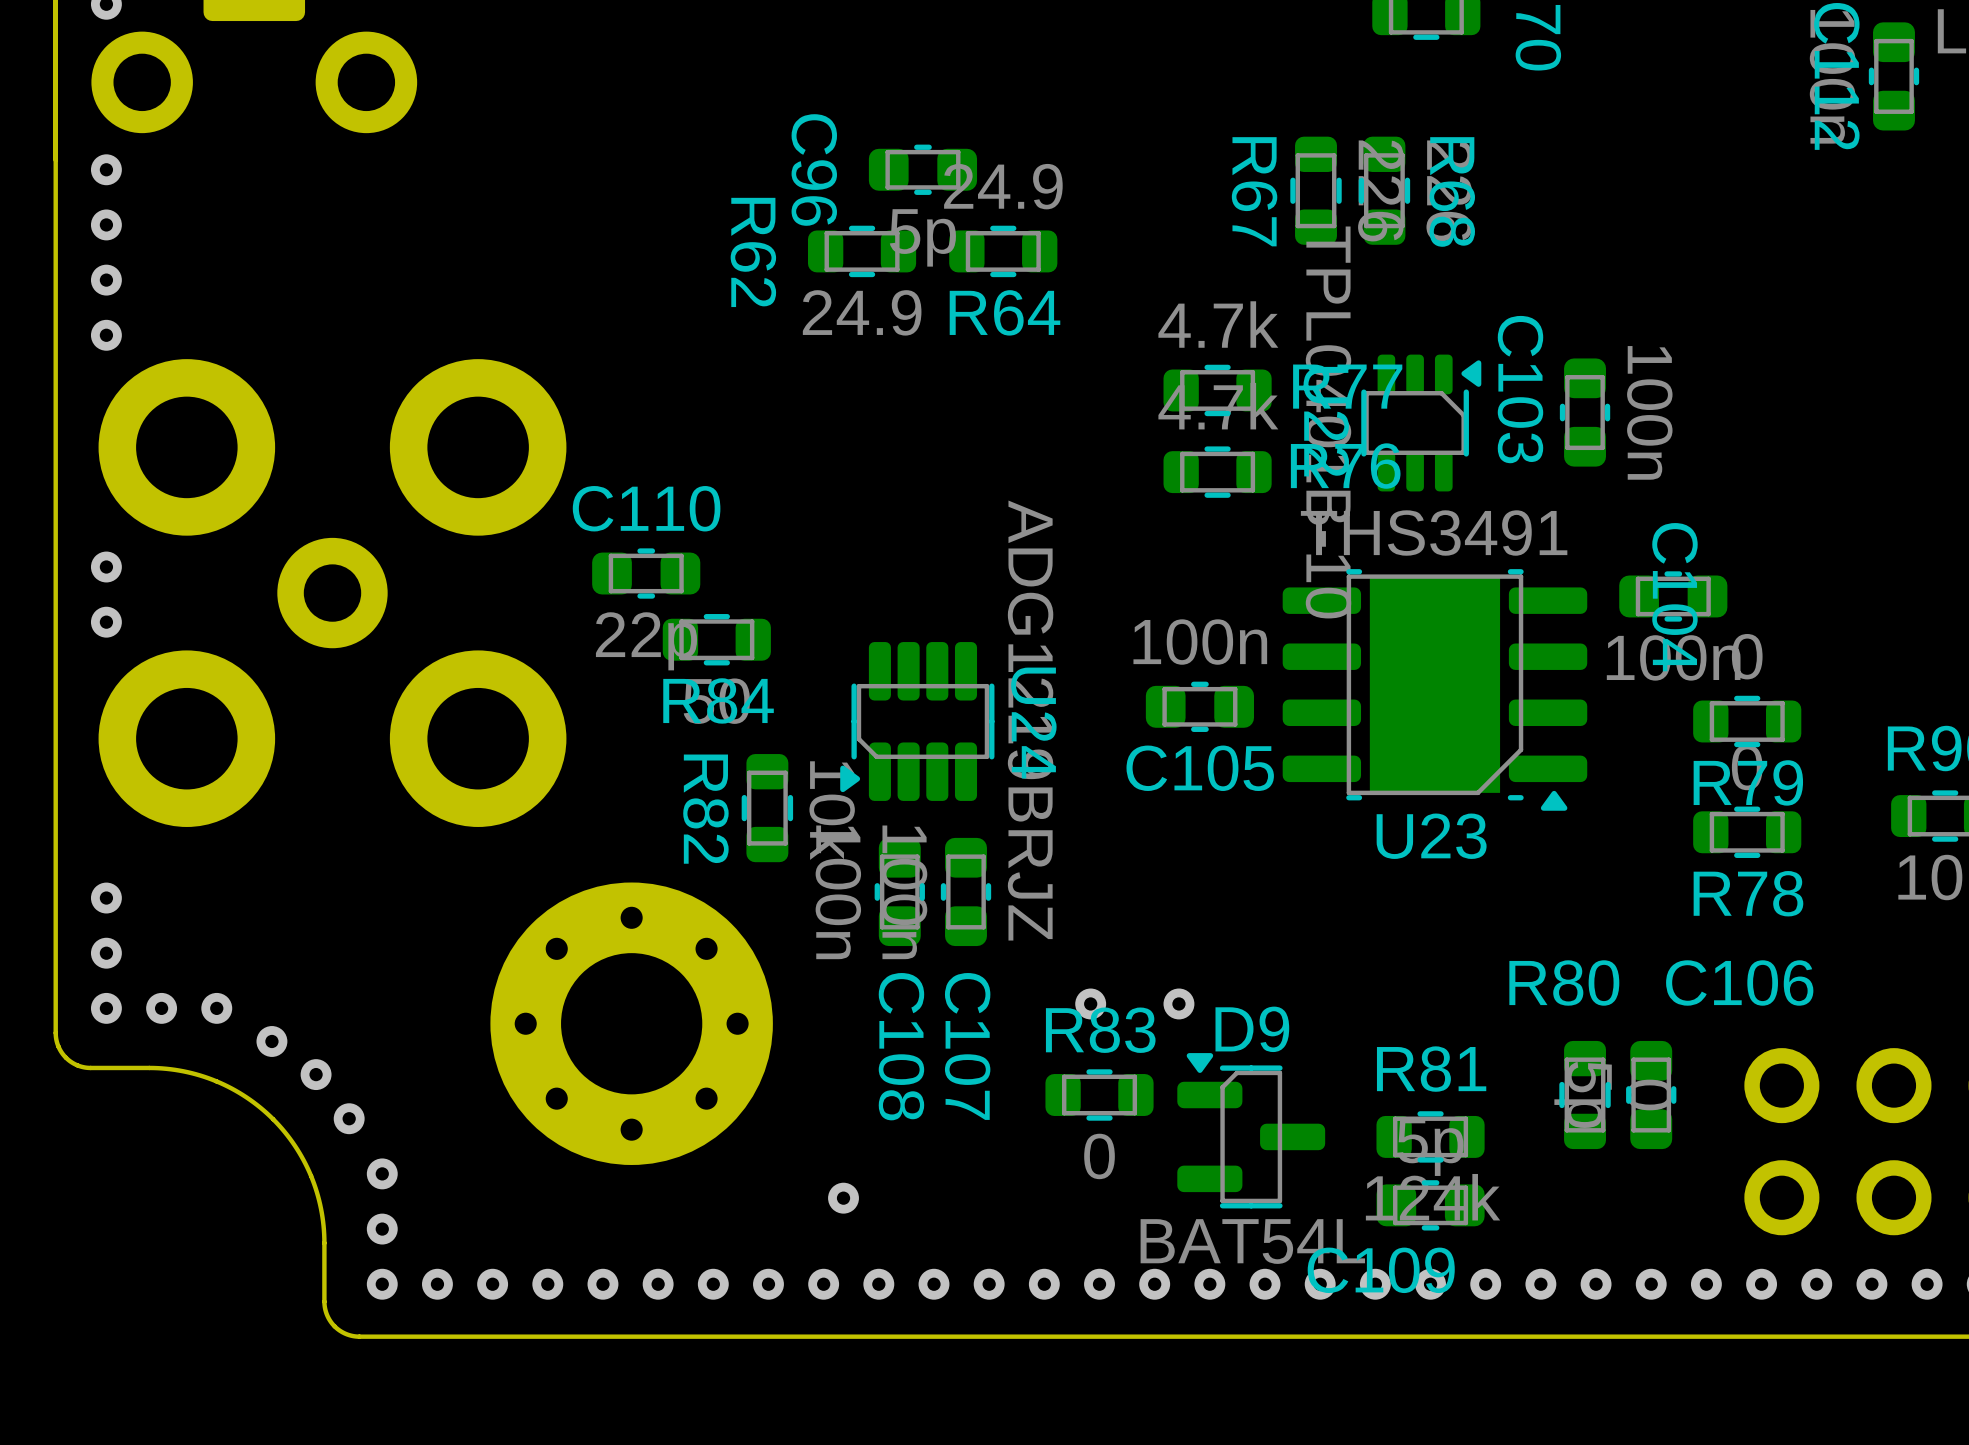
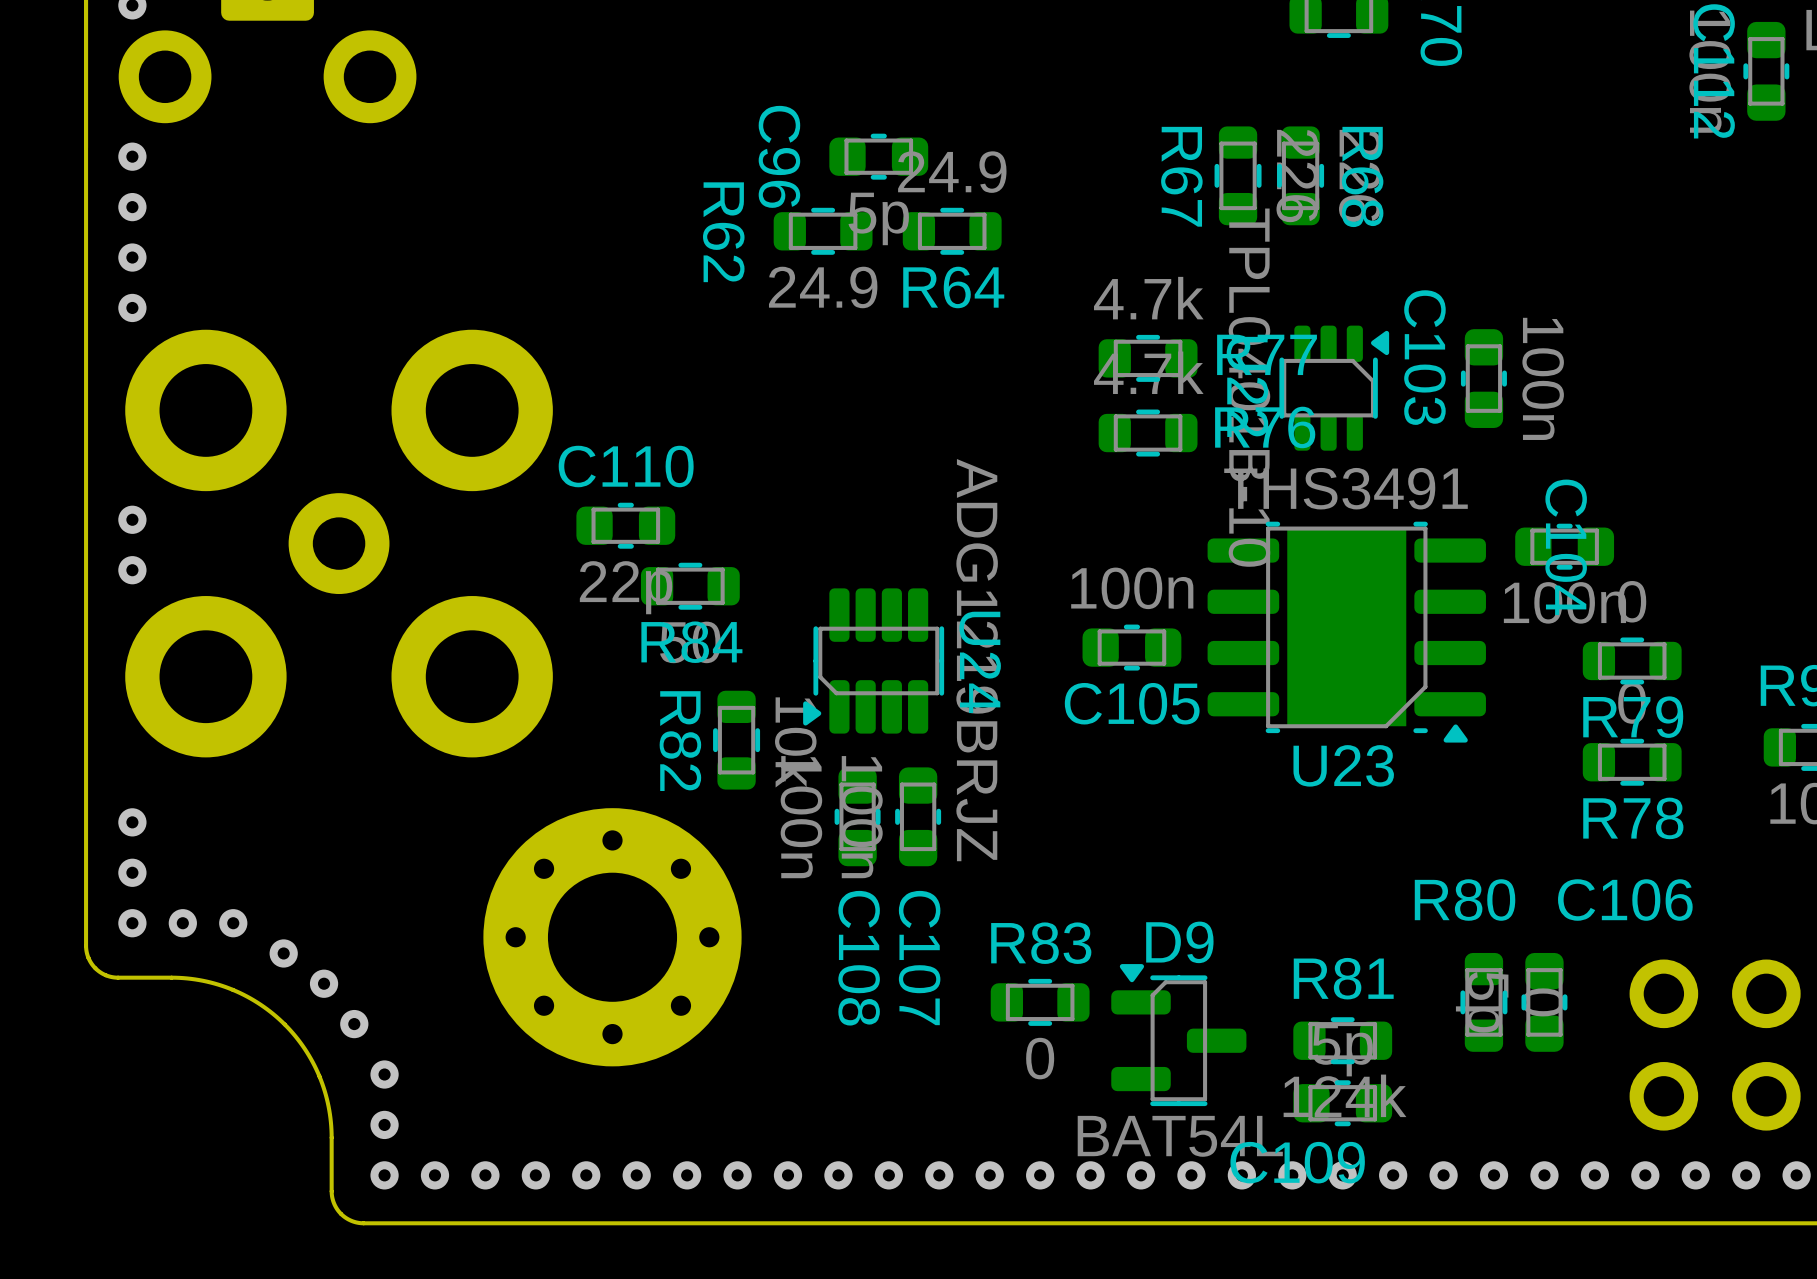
via: (1090, 1003) -> none
via: (1178, 1003) -> none
via: (843, 1198) -> none

